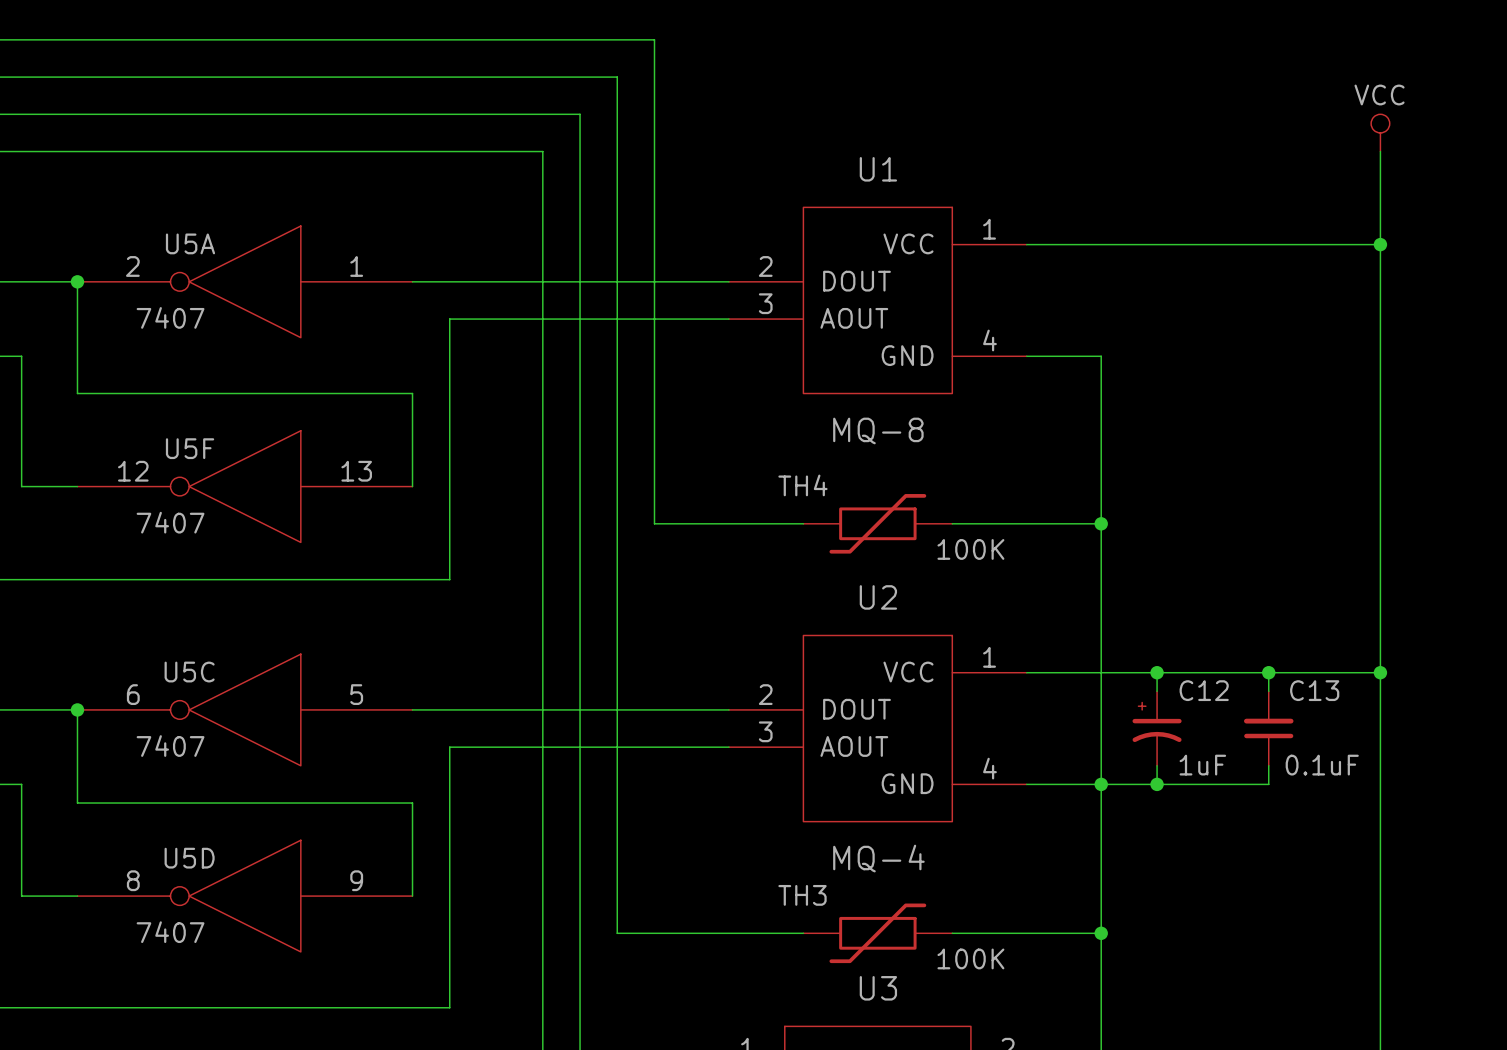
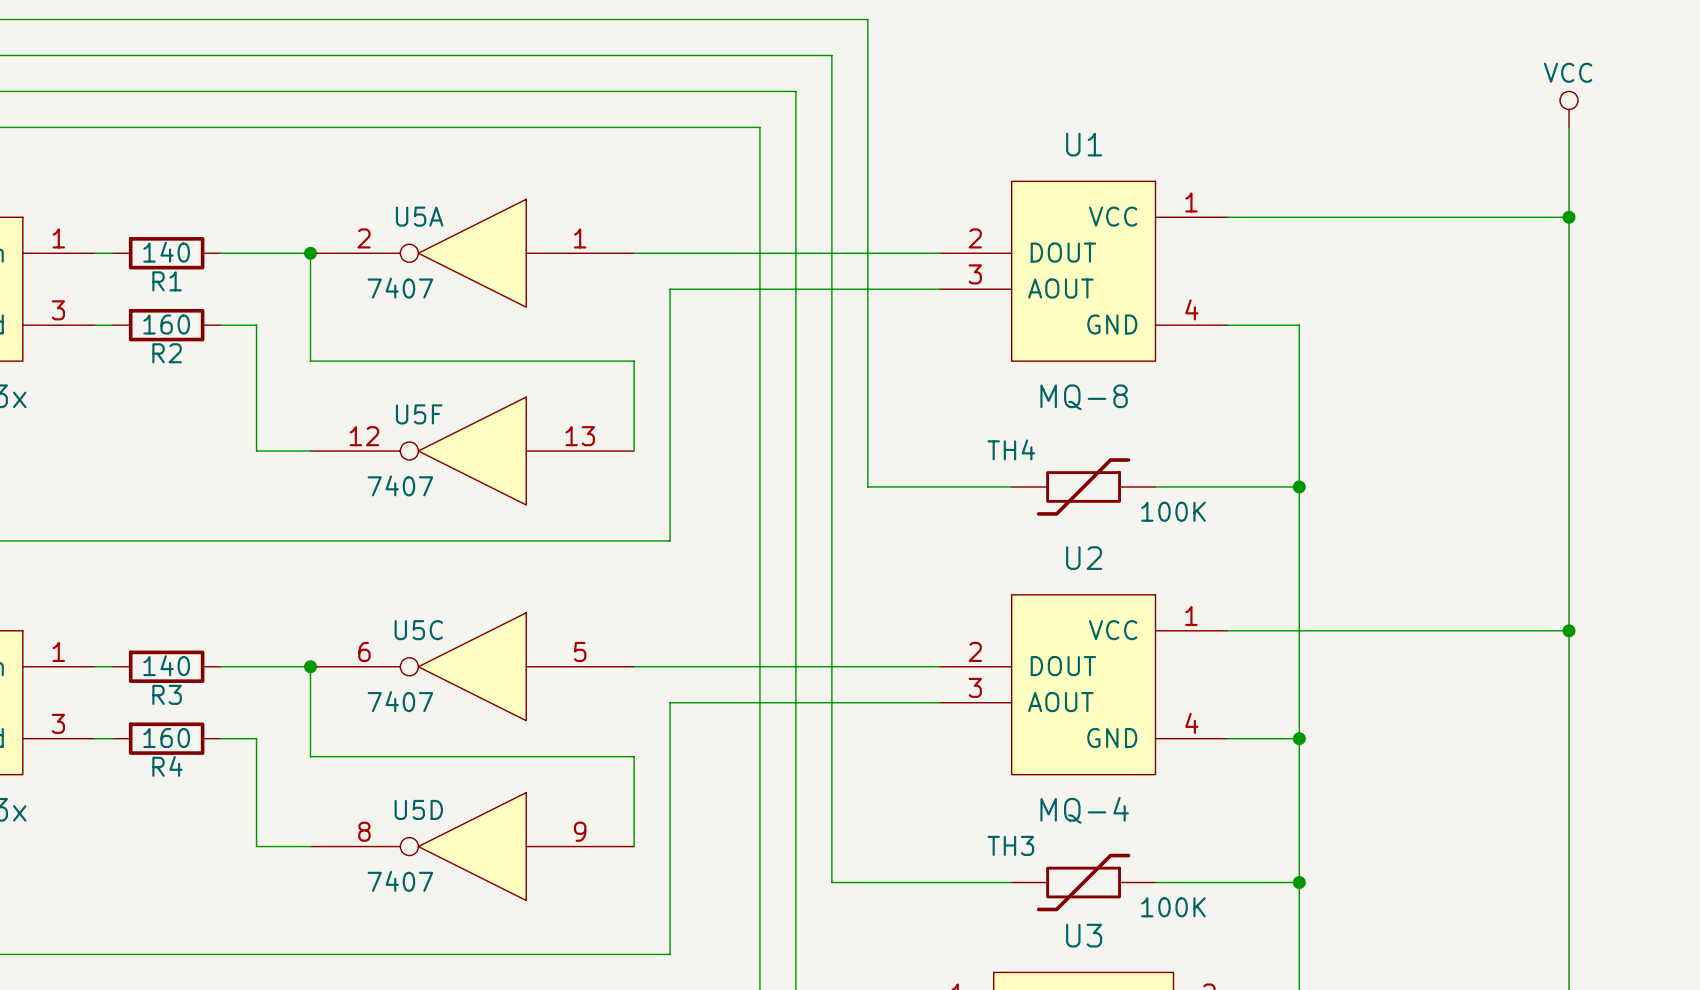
wire: (1157, 672) (1157, 691) -> none
junction: (1157, 672) -> none
wire: (1268, 672) (1268, 691) -> none
junction: (1268, 672) -> none
C12: 1uF (1157, 728) -> none
C13: 0.1uF (1268, 728) -> none
wire: (1157, 765) (1157, 784) -> none
wire: (1268, 765) (1268, 784) (1101, 784) -> none
junction: (1157, 784) -> none

